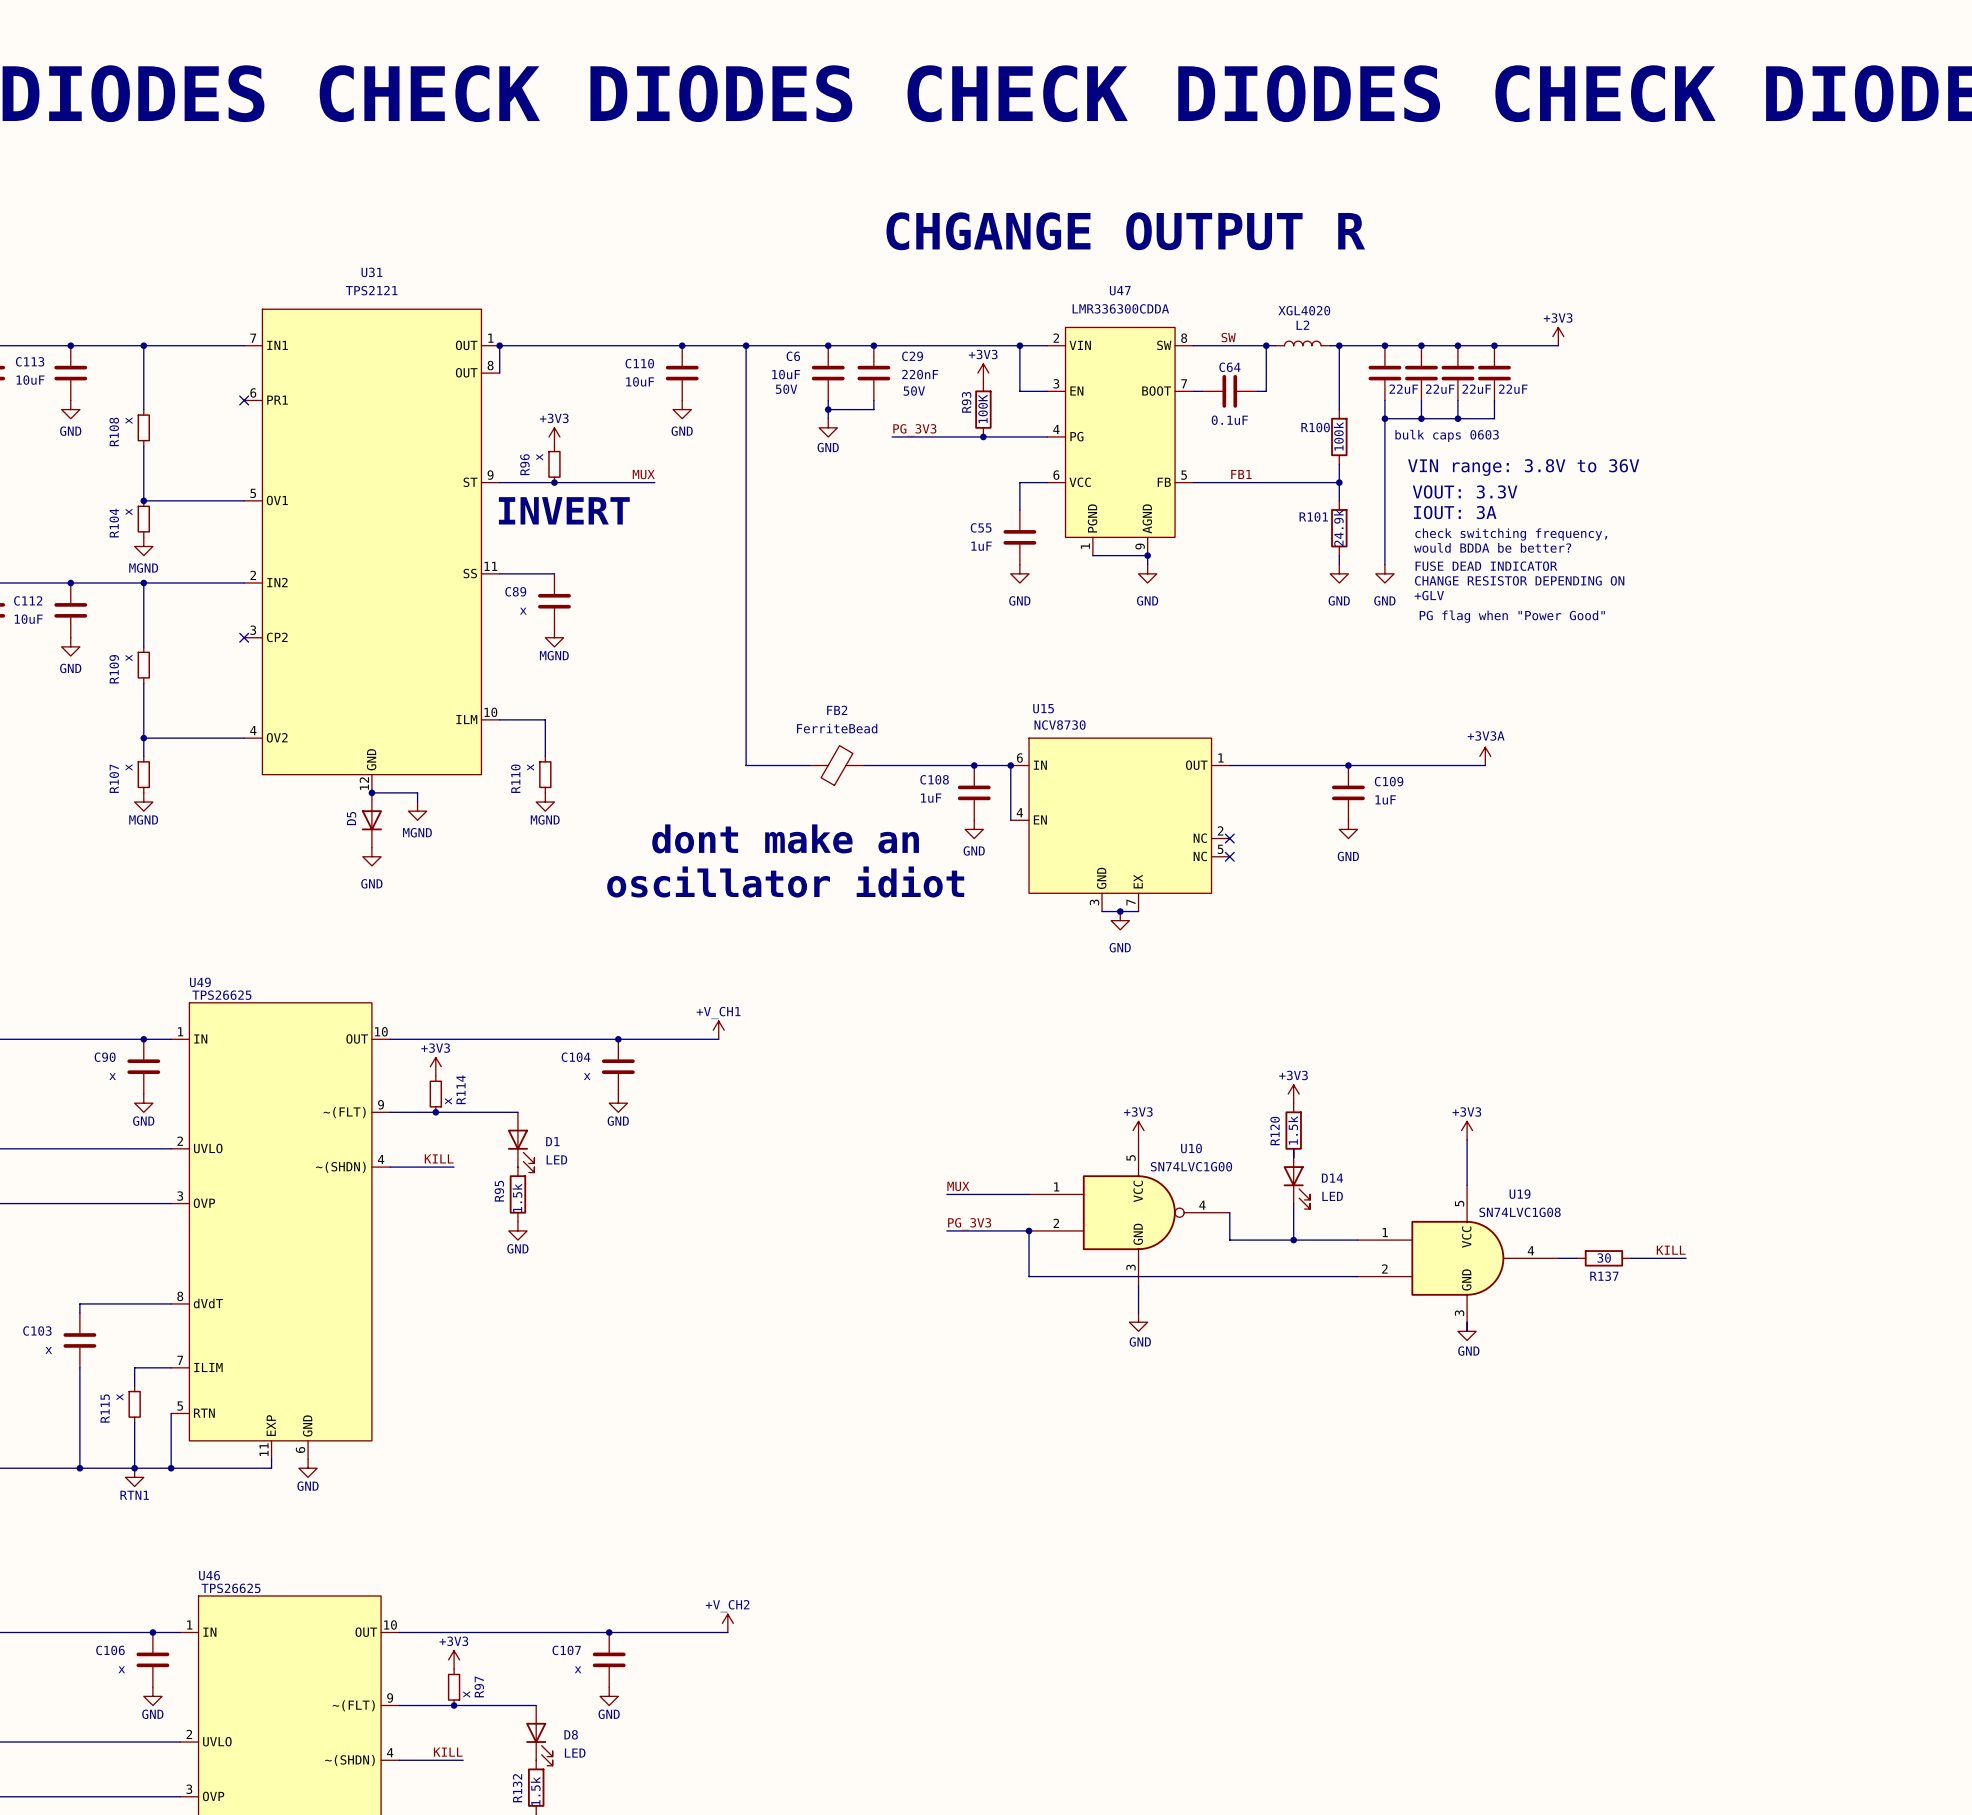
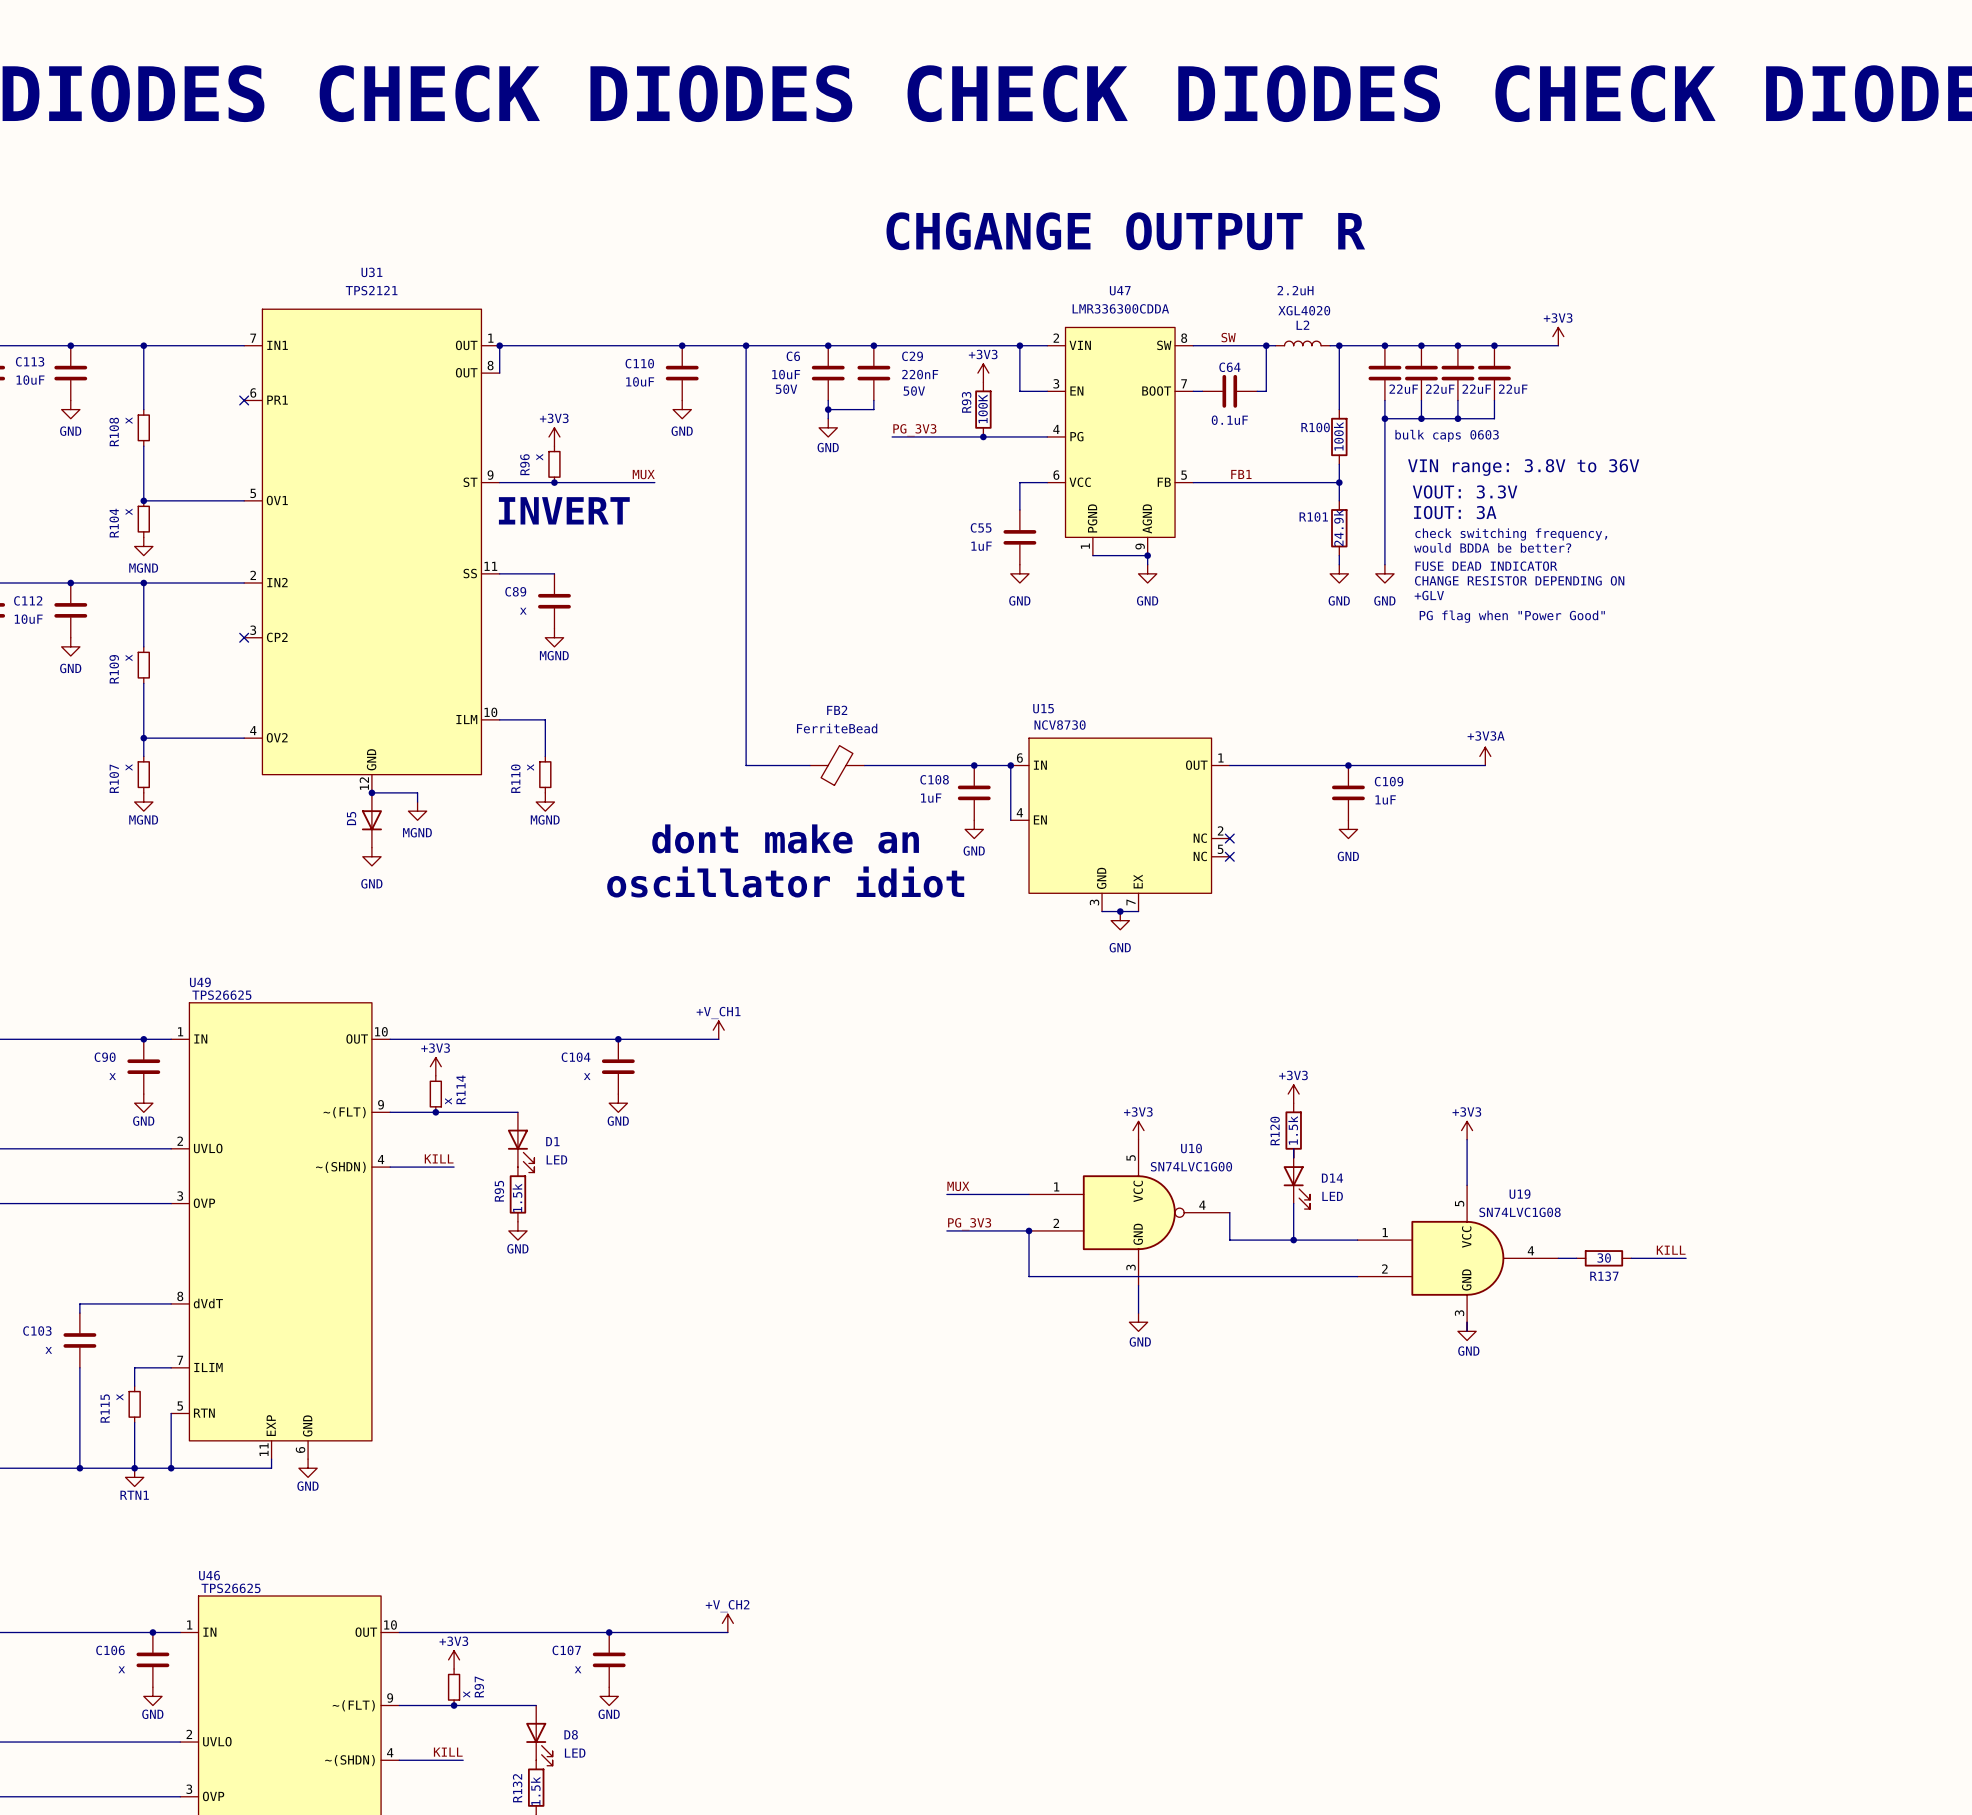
text: none -> 2.2uH (1295, 290)

